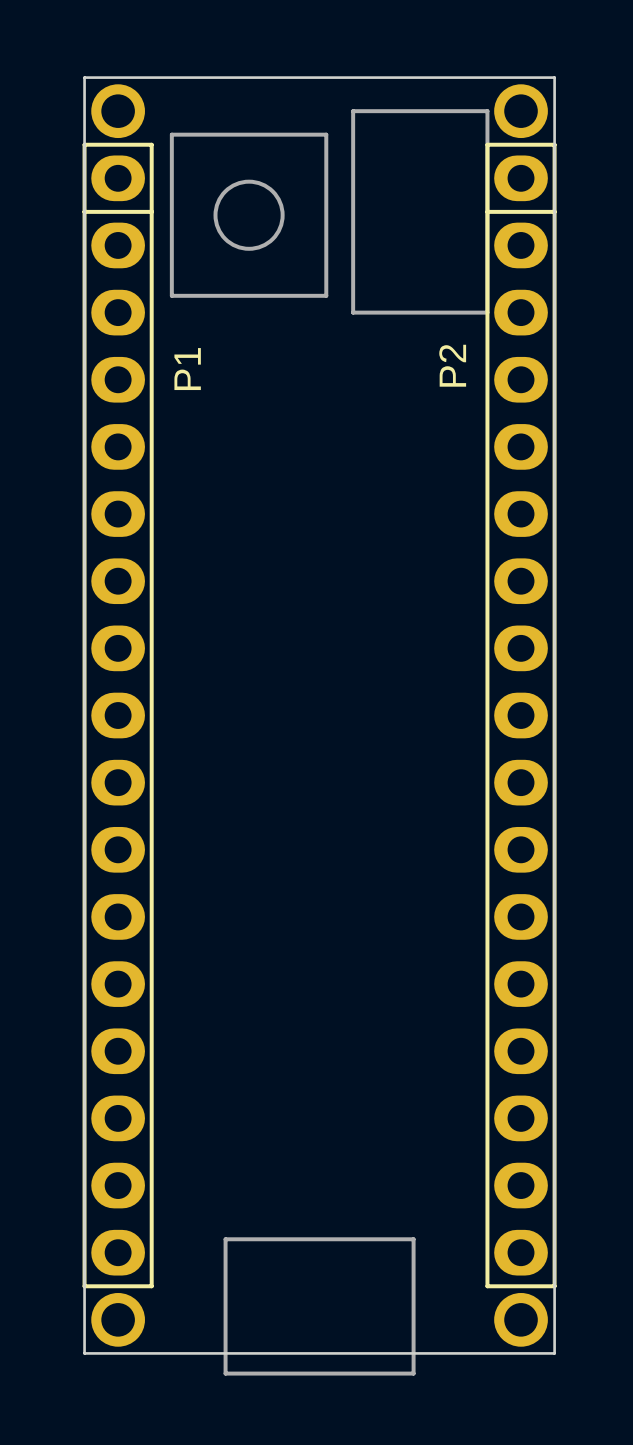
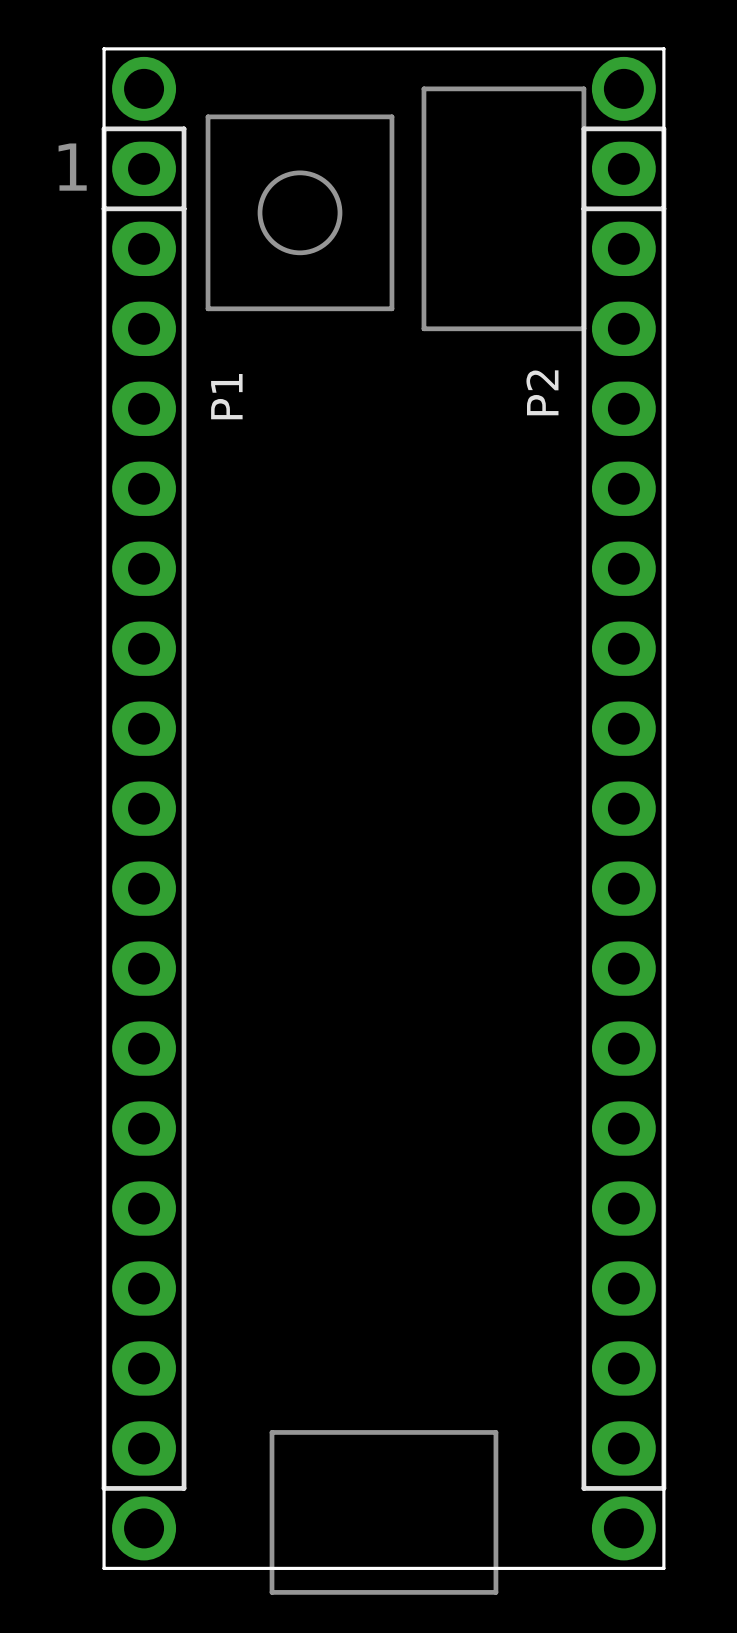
text: none -> 1 (72, 167)

